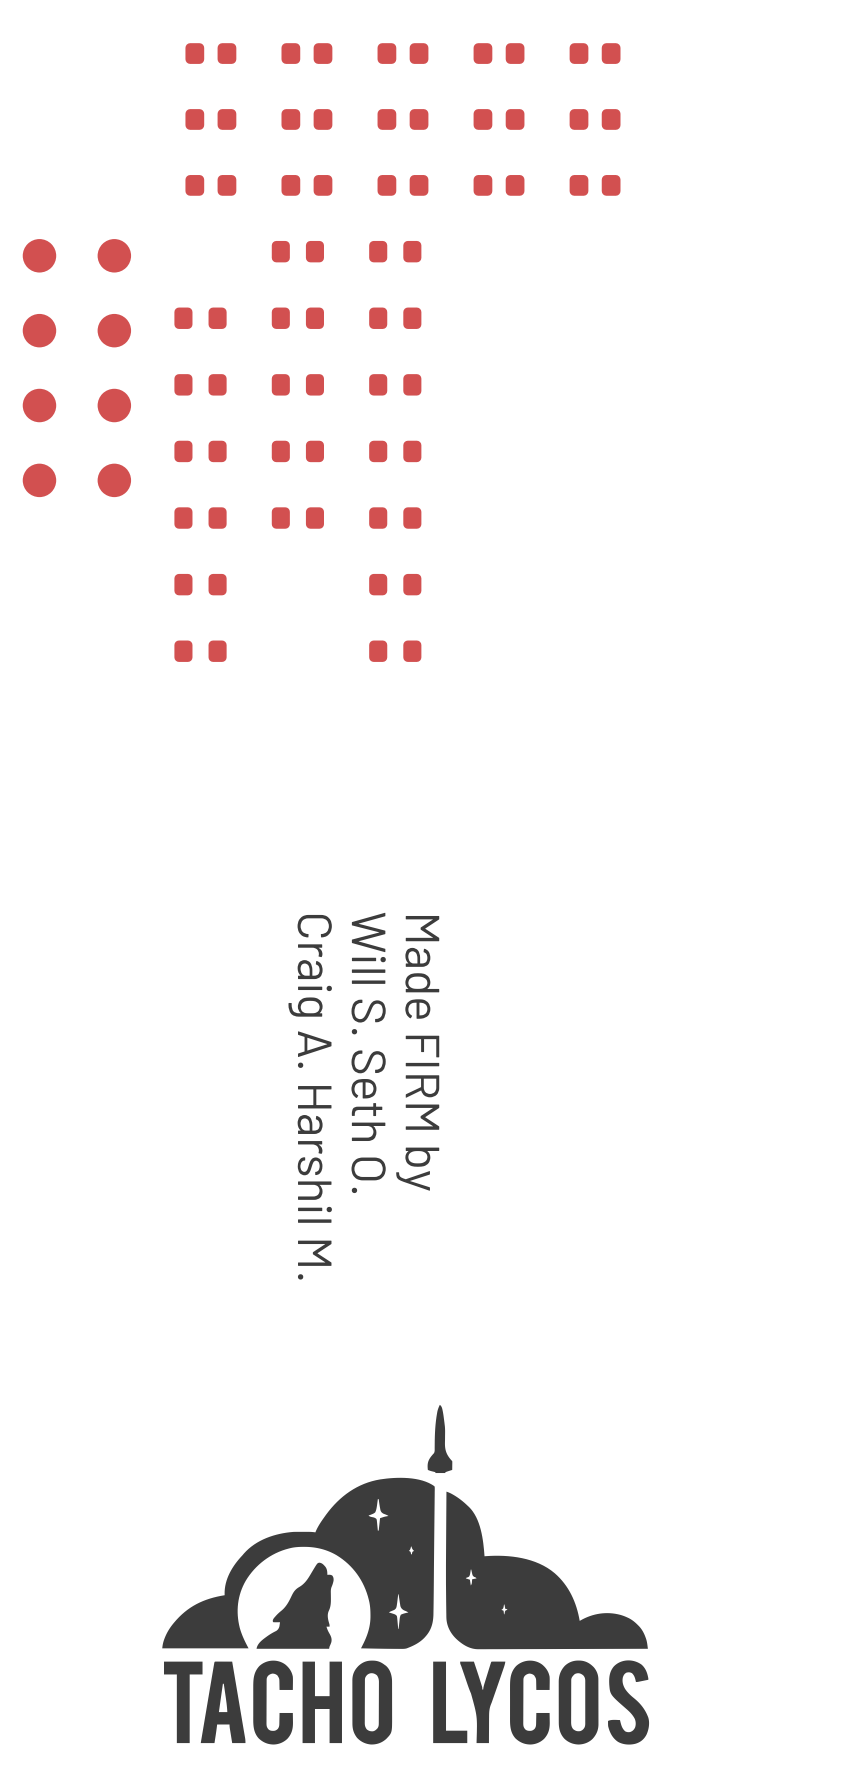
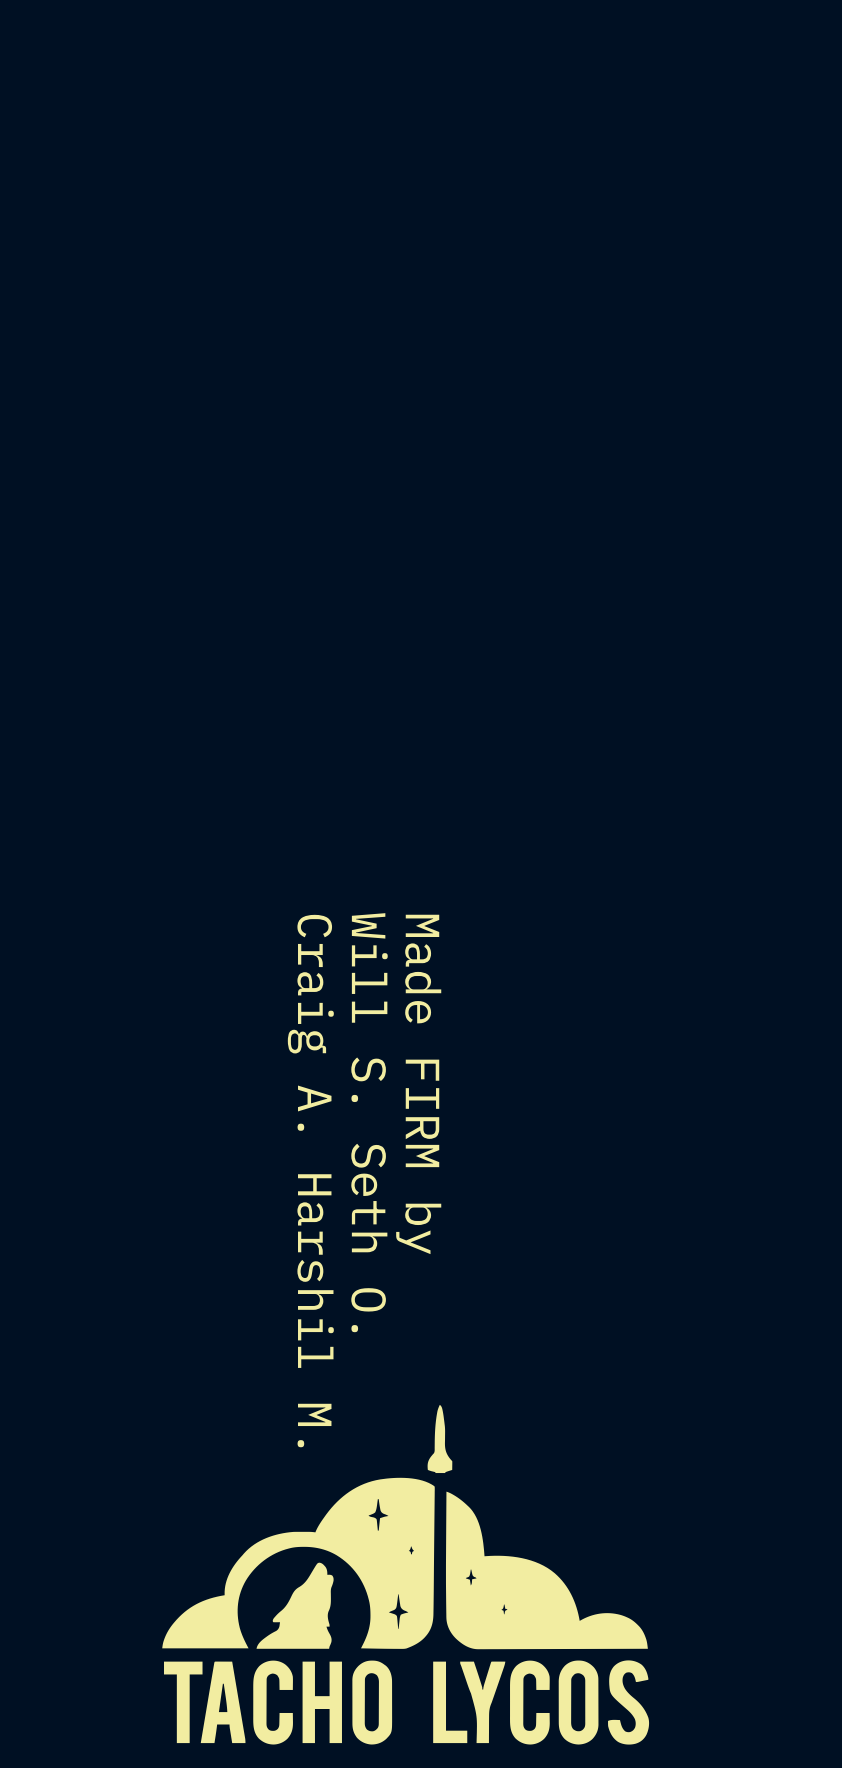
part: (210, 53) -> none
part: (306, 53) -> none
part: (402, 53) -> none
part: (499, 53) -> none
part: (595, 53) -> none
part: (210, 119) -> none
part: (306, 119) -> none
part: (402, 119) -> none
part: (499, 119) -> none
part: (595, 119) -> none
part: (210, 185) -> none
part: (306, 185) -> none
part: (402, 185) -> none
part: (499, 185) -> none
part: (595, 185) -> none
part: (297, 251) -> none
part: (395, 251) -> none
part: (39, 255) -> none
part: (114, 255) -> none
part: (200, 318) -> none
part: (297, 318) -> none
part: (395, 318) -> none
part: (39, 330) -> none
part: (114, 330) -> none
part: (200, 384) -> none
part: (297, 384) -> none
part: (395, 384) -> none
part: (39, 405) -> none
part: (114, 405) -> none
part: (200, 451) -> none
part: (297, 451) -> none
part: (395, 451) -> none
part: (39, 480) -> none
part: (114, 480) -> none
part: (200, 518) -> none
part: (297, 518) -> none
part: (395, 518) -> none
part: (200, 584) -> none
part: (395, 584) -> none
part: (200, 651) -> none
part: (395, 651) -> none

